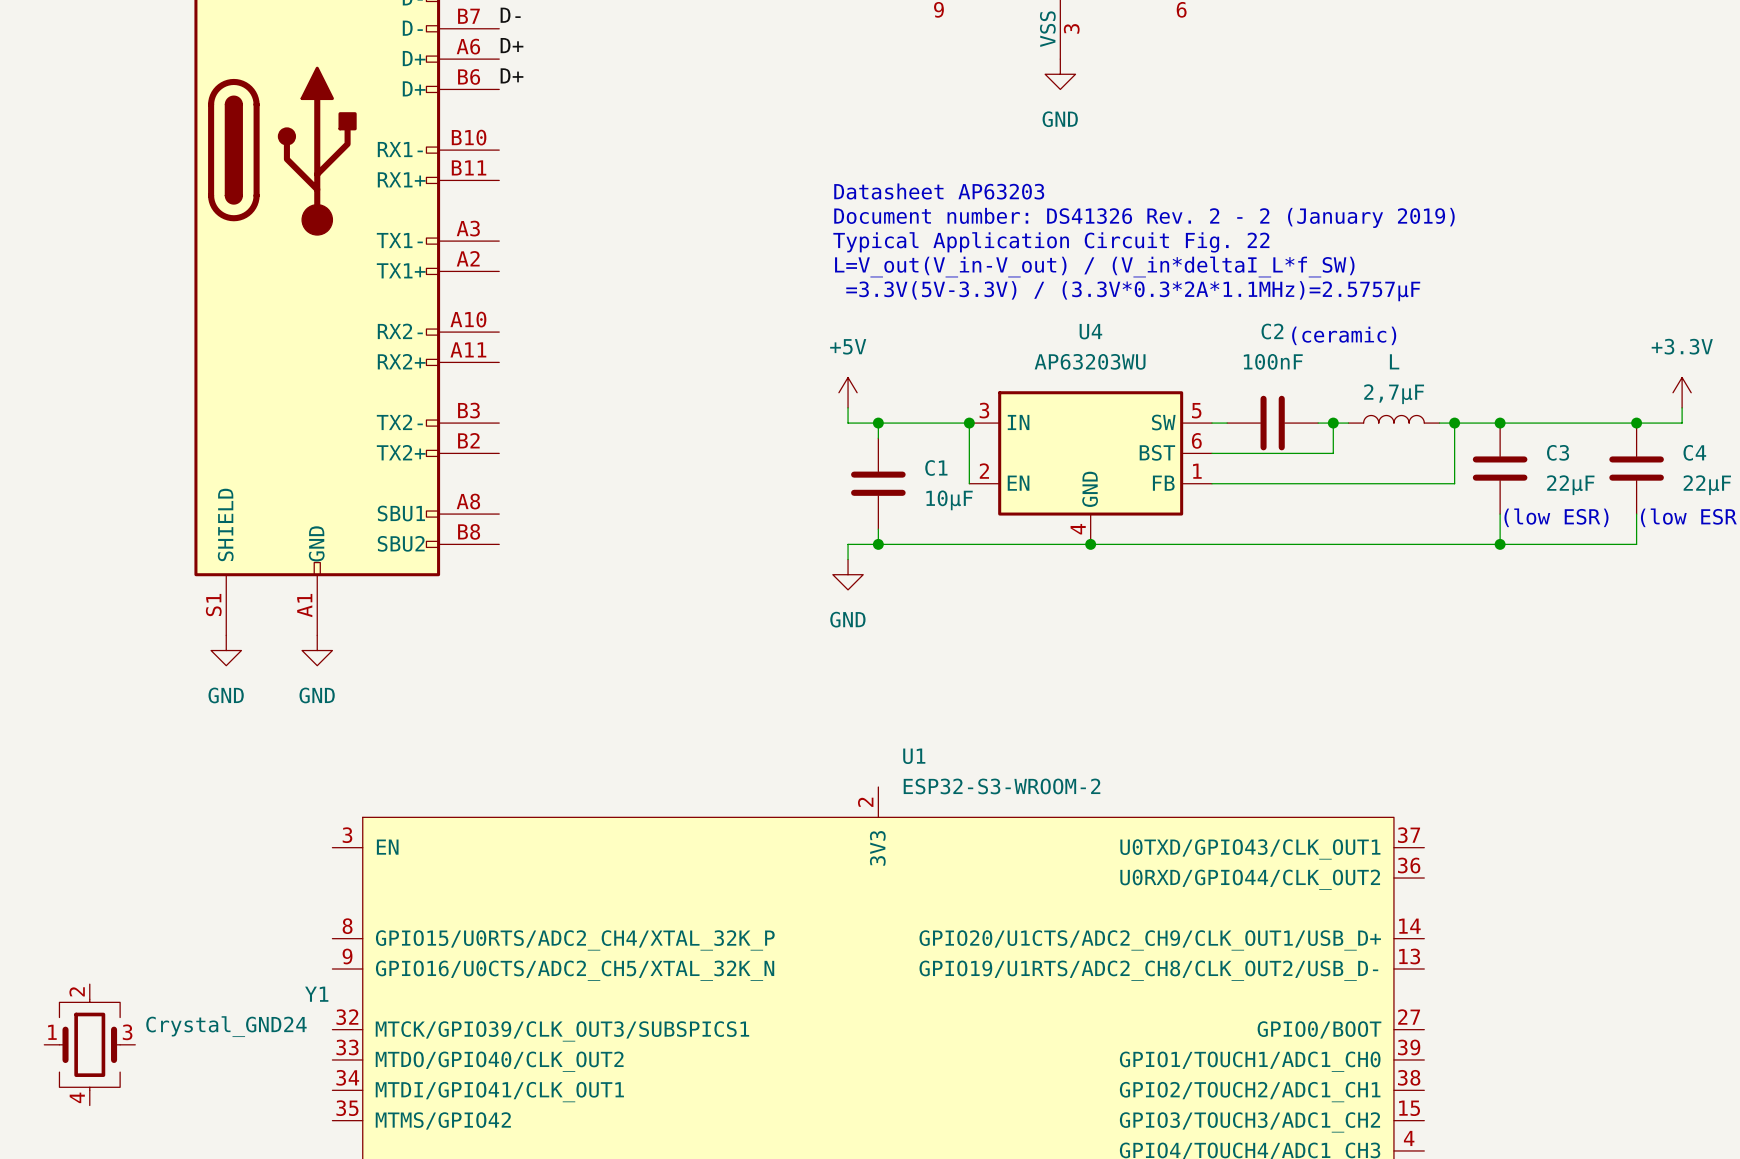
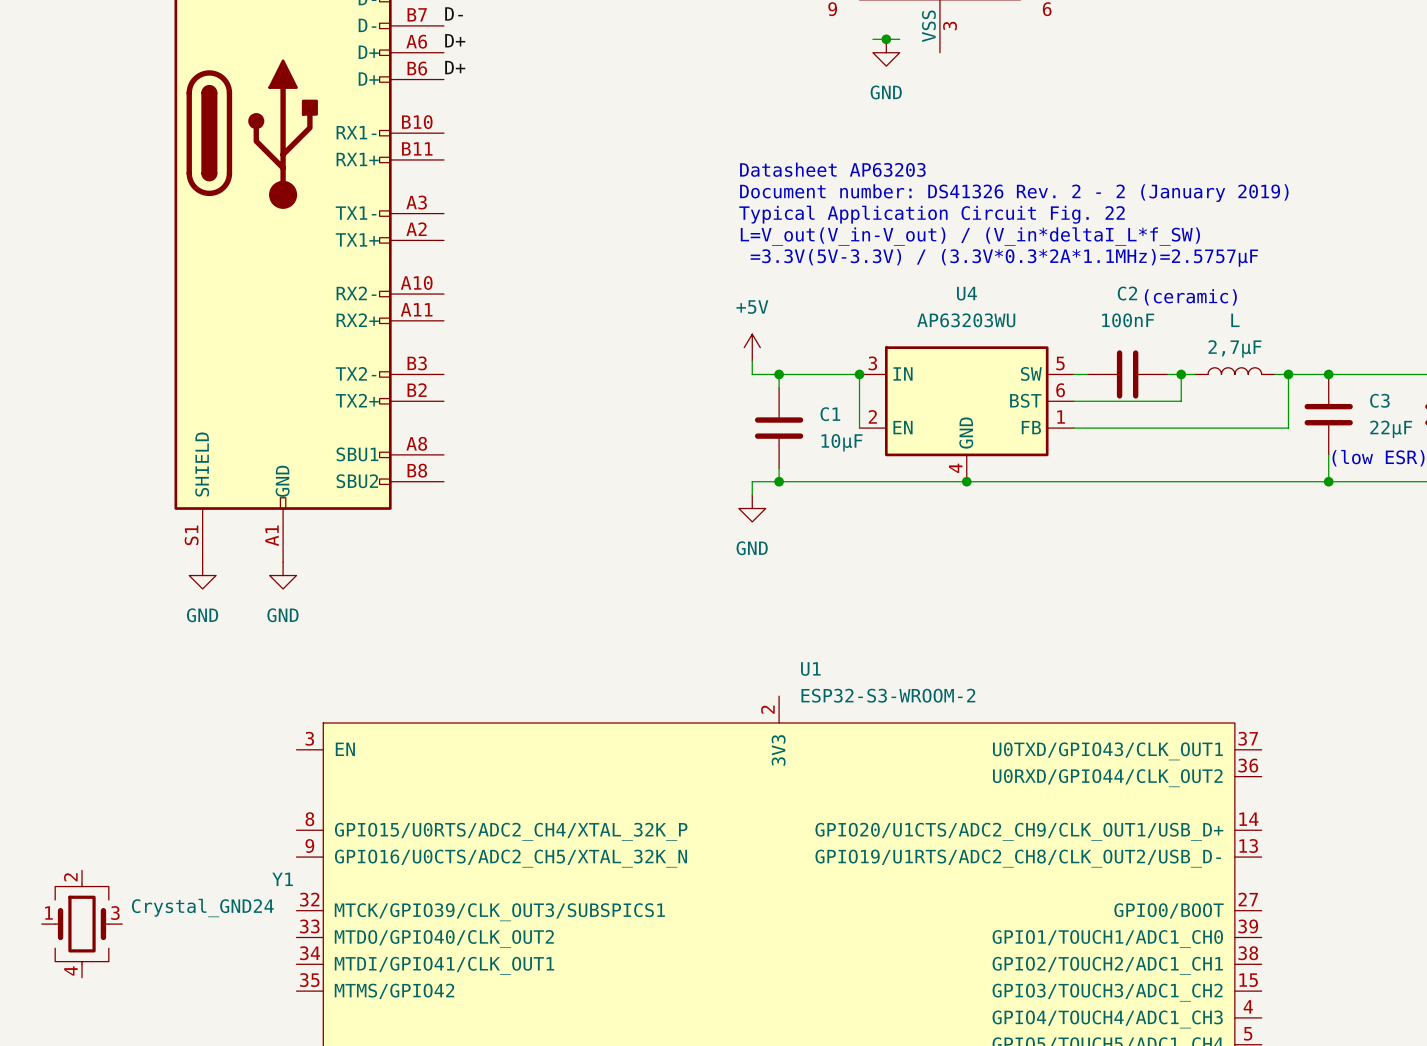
wire: none -> (872, 39) (899, 39)
junction: none -> (886, 39)
power symbol position: GND (1060, 74) -> GND (886, 52)

